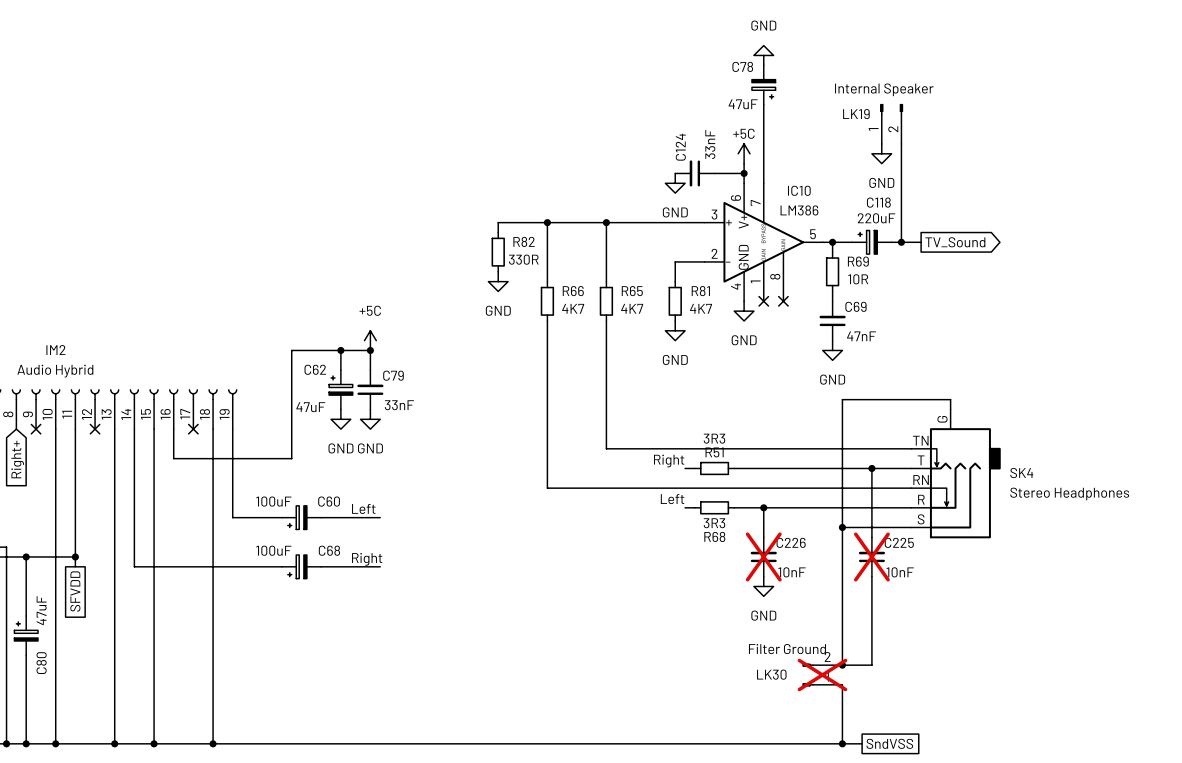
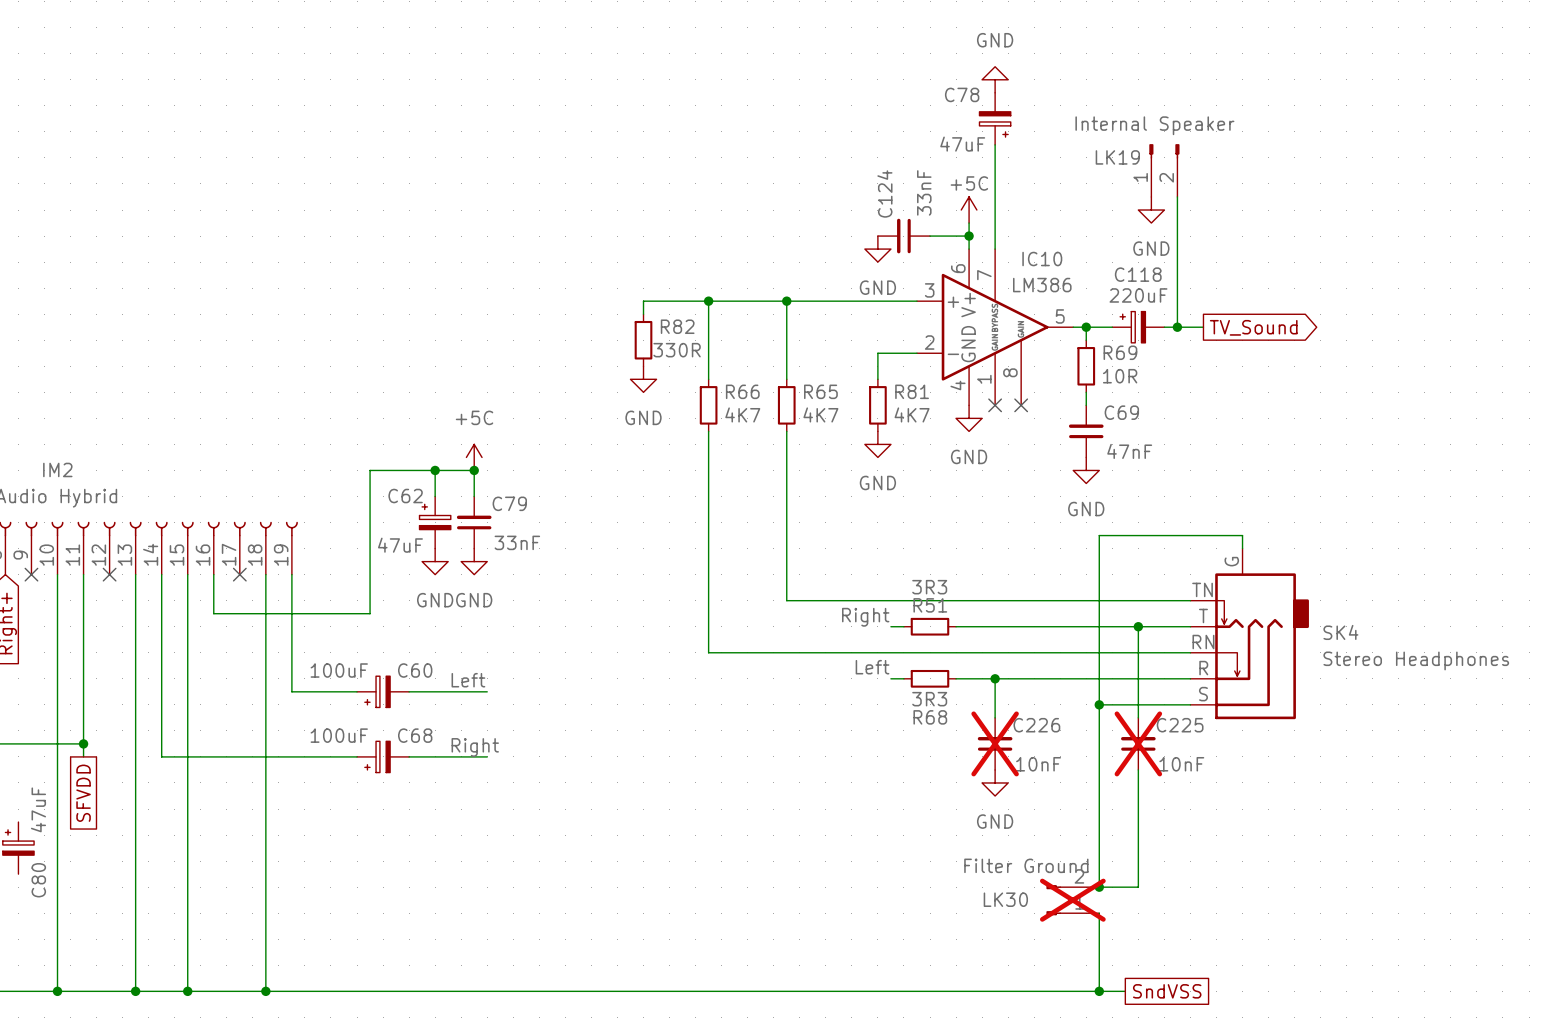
wire: (26, 556) (26, 615) -> none
junction: (26, 556) -> none
wire: (26, 655) (26, 743) -> none
junction: (26, 743) -> none

